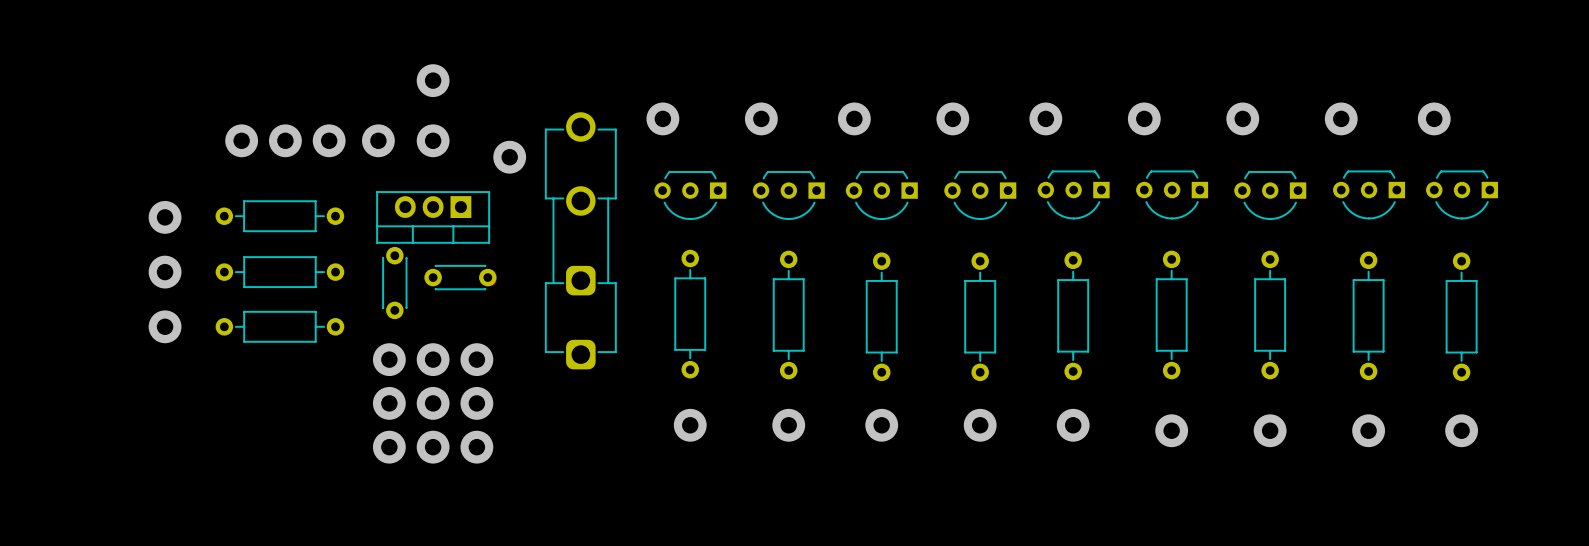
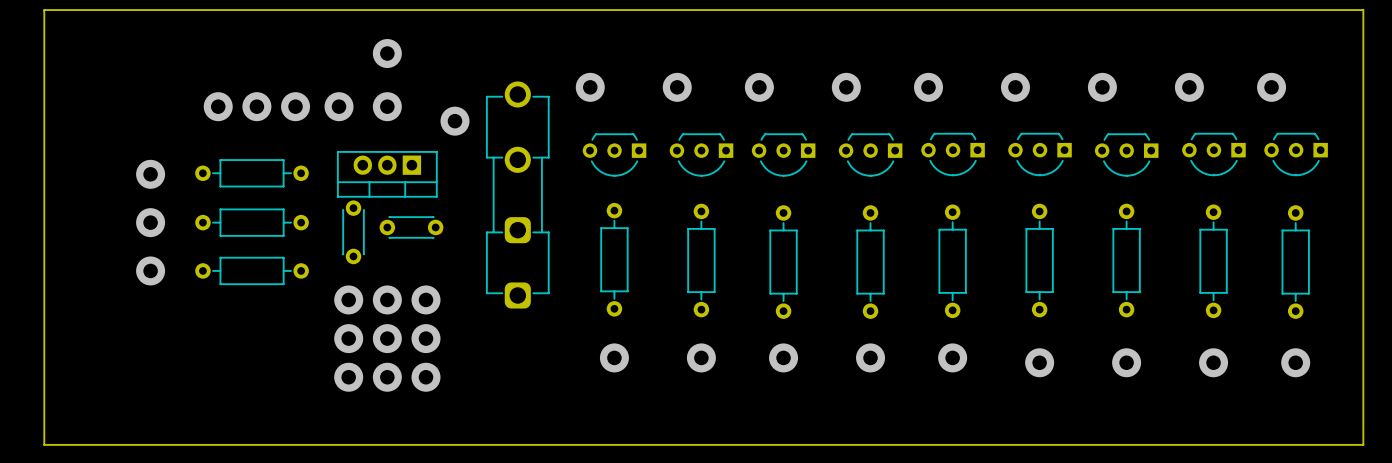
board edge: none -> (44, 10) (1363, 10) (1363, 444) (44, 444) (44, 10)

